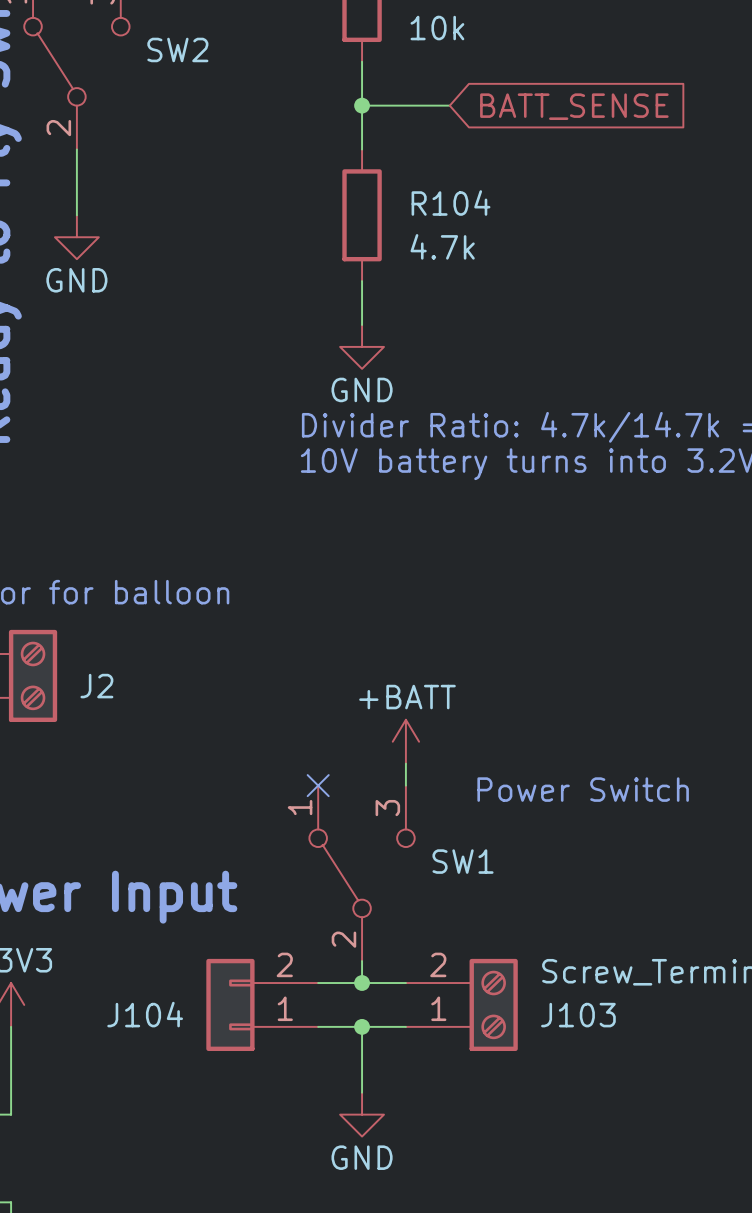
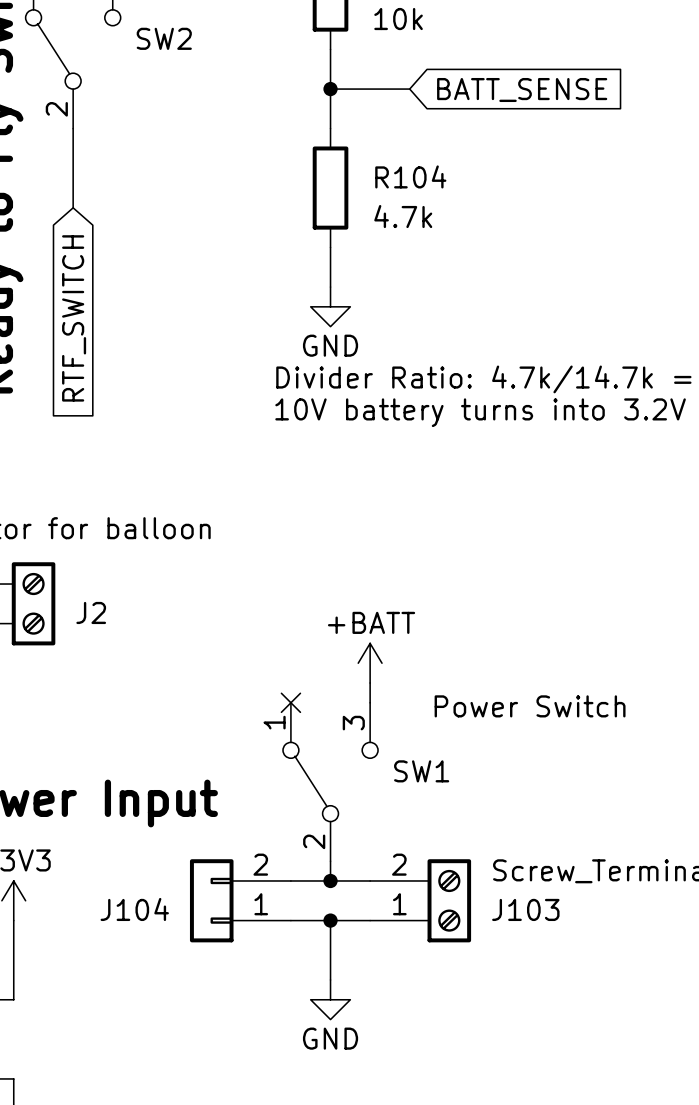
power symbol: GND (76, 237) -> none
global label: none -> RTF_SWITCH (74, 318)

